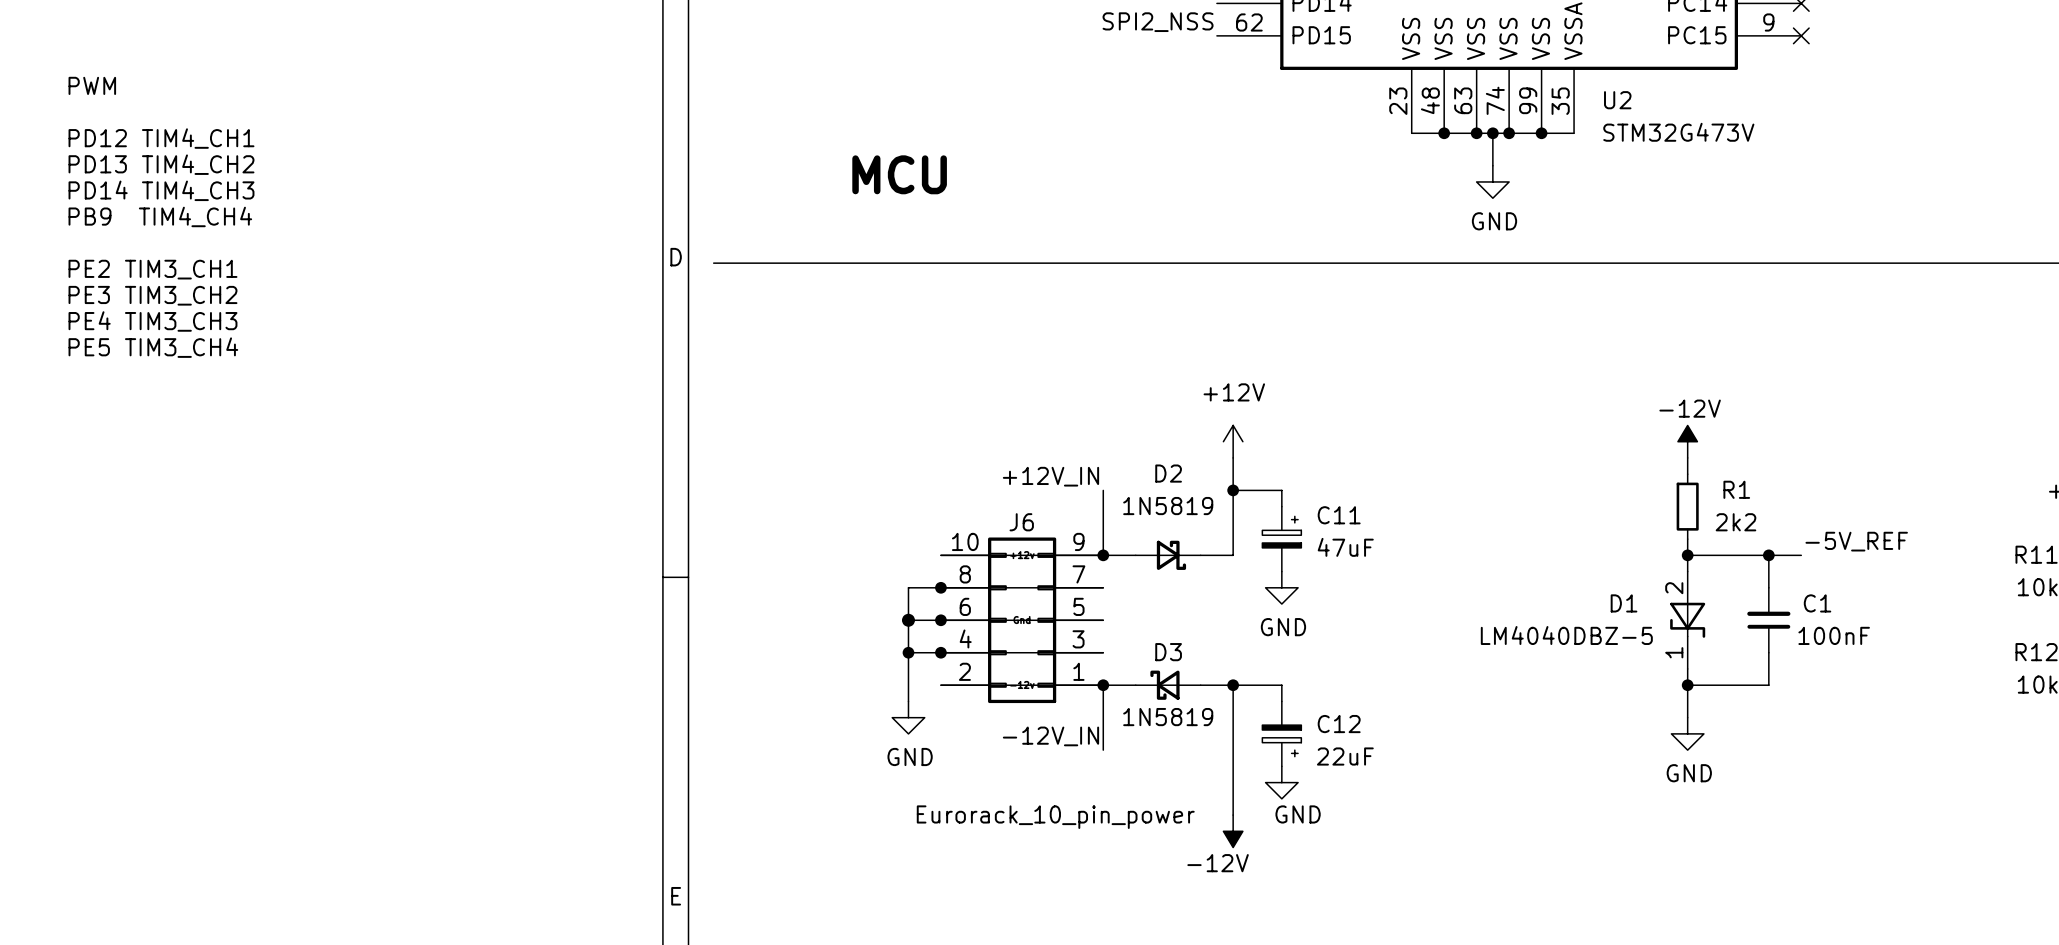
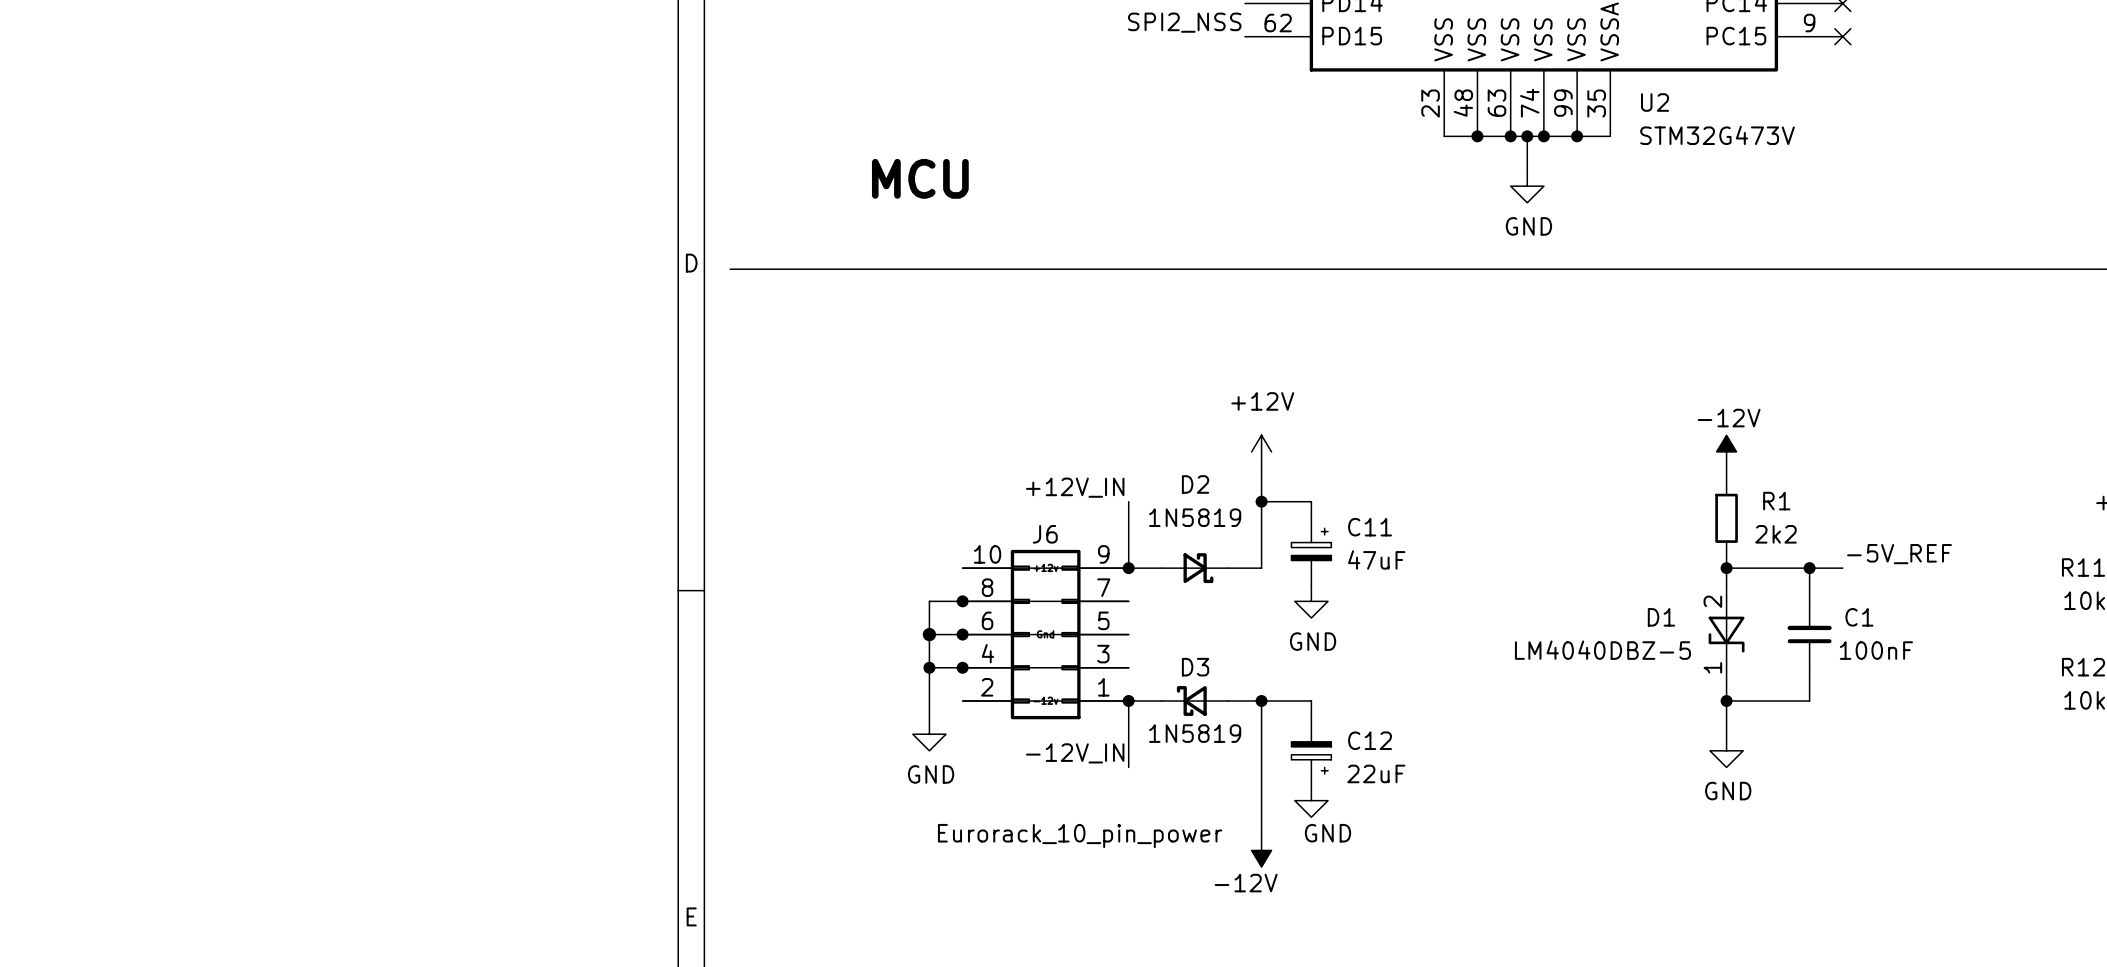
text: PWM (92, 85) -> none
text: PD12 TIM4_CH1 (161, 138) -> none
text: PD13 TIM4_CH2 (161, 164) -> none
text: PD14 TIM4_CH3 (161, 190) -> none
text: PB9 TIM4_CH4 (160, 216) -> none
text: PE2 TIM3_CH1 (152, 269) -> none
text: PE3 TIM3_CH2 (152, 295) -> none
text: PE4 TIM3_CH3 (152, 321) -> none
text: PE5 TIM3_CH4 (153, 347) -> none

